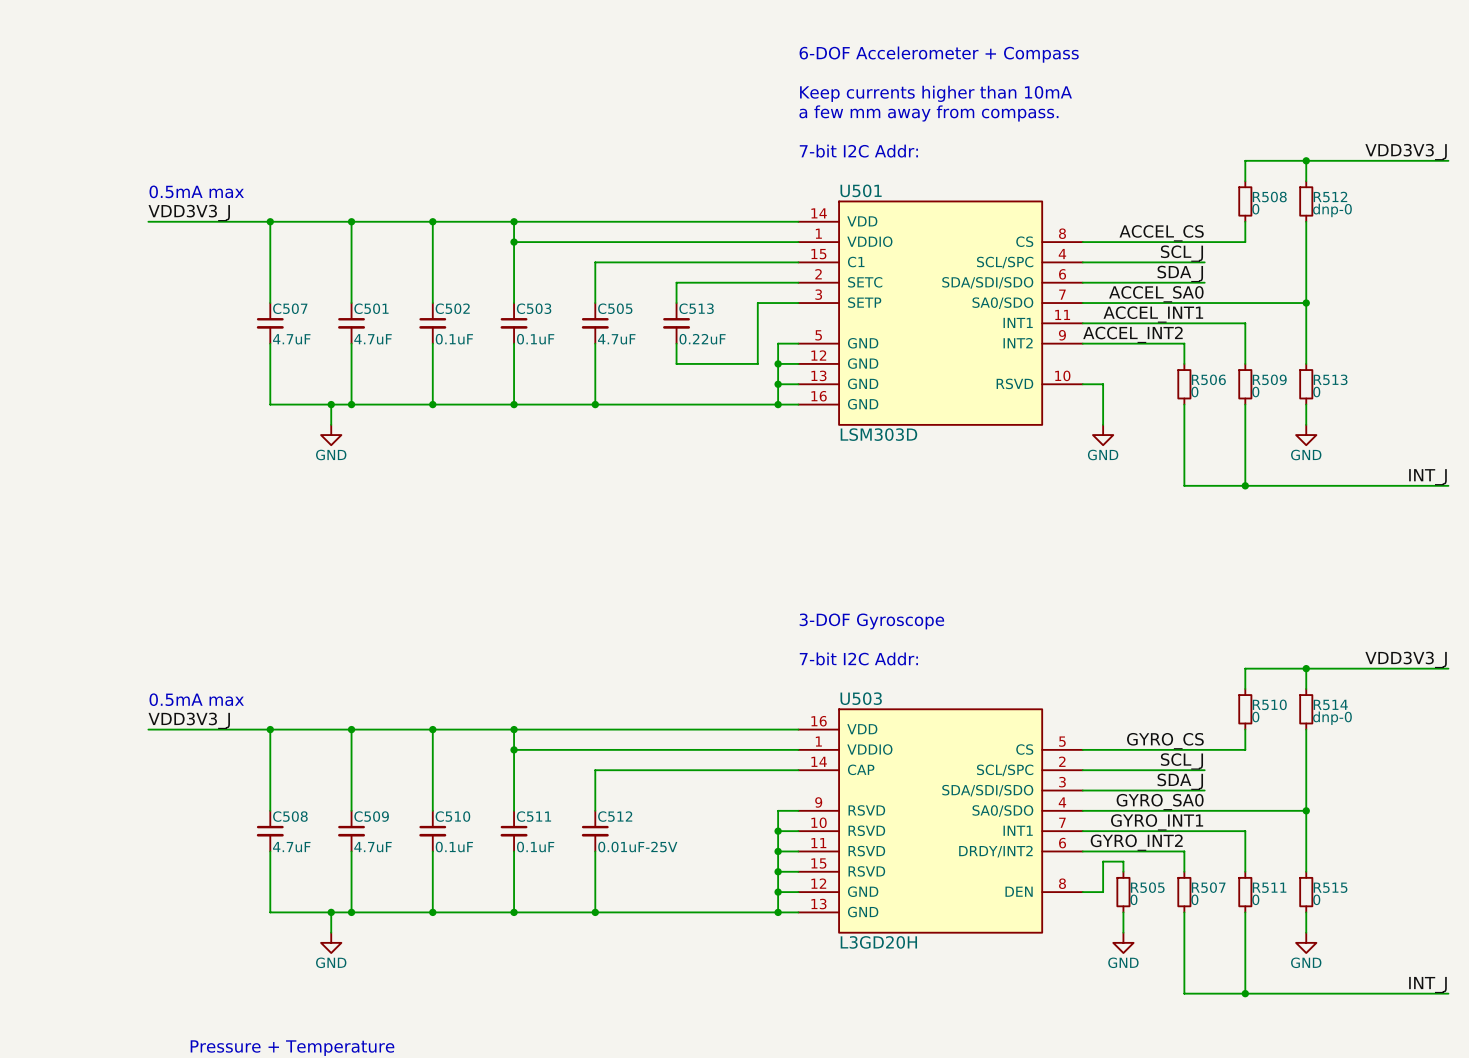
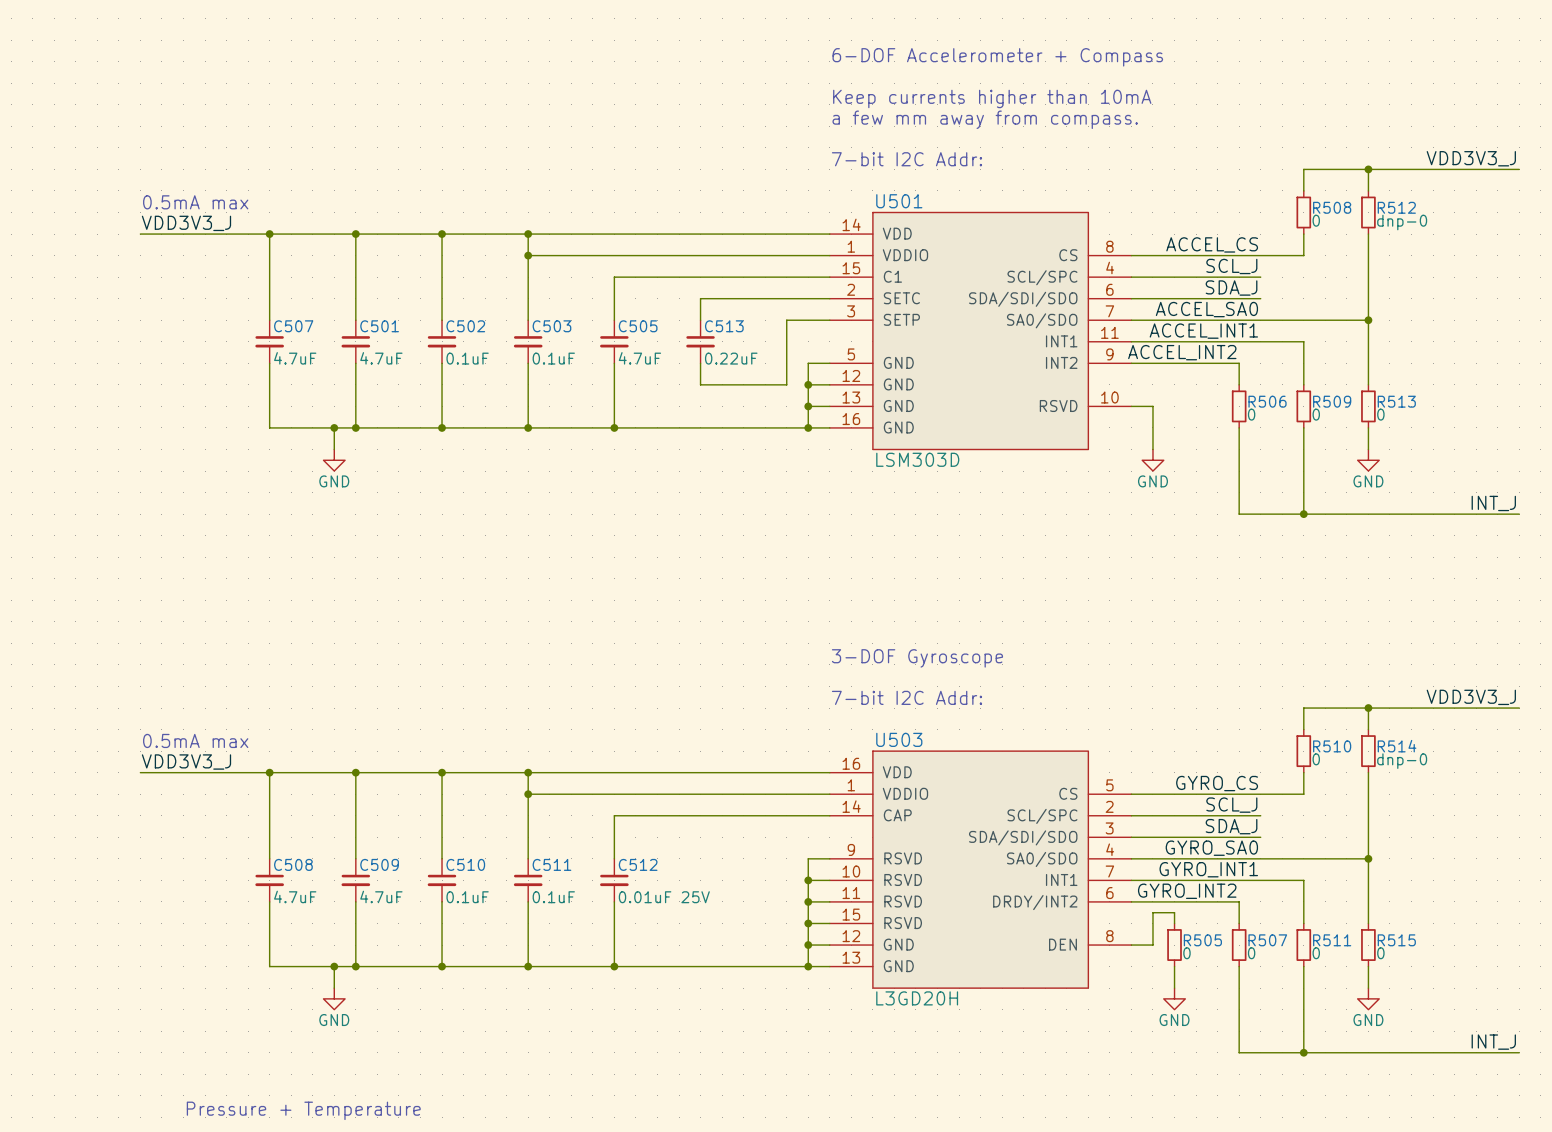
C512 value: 0.01uF-25V (637, 847) -> 0.01uF 25V (664, 897)

